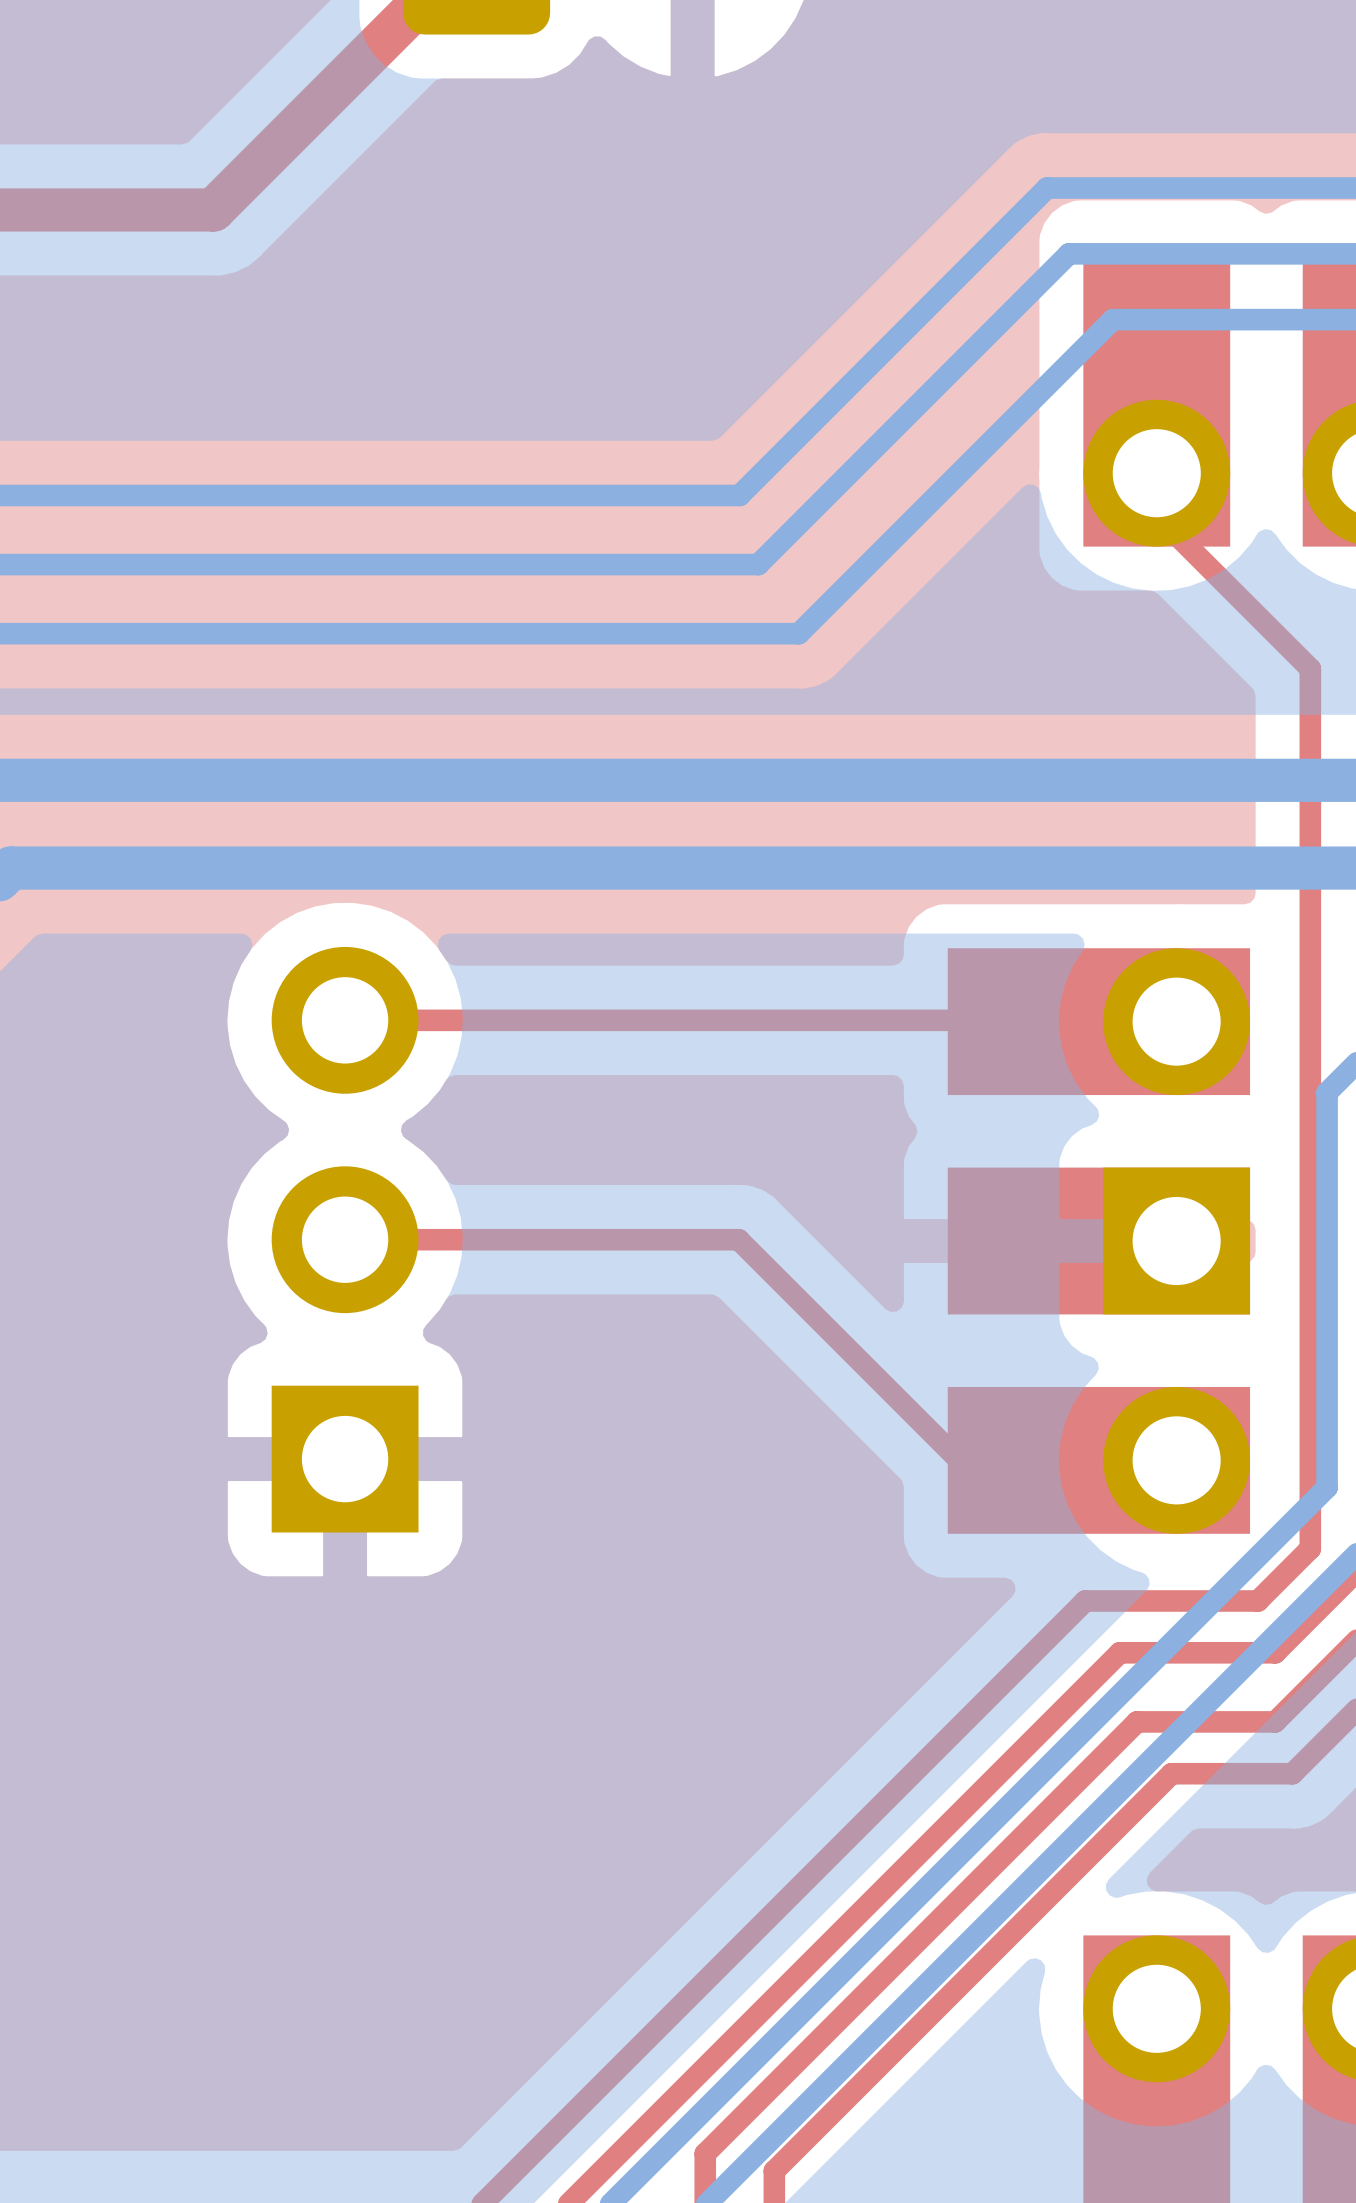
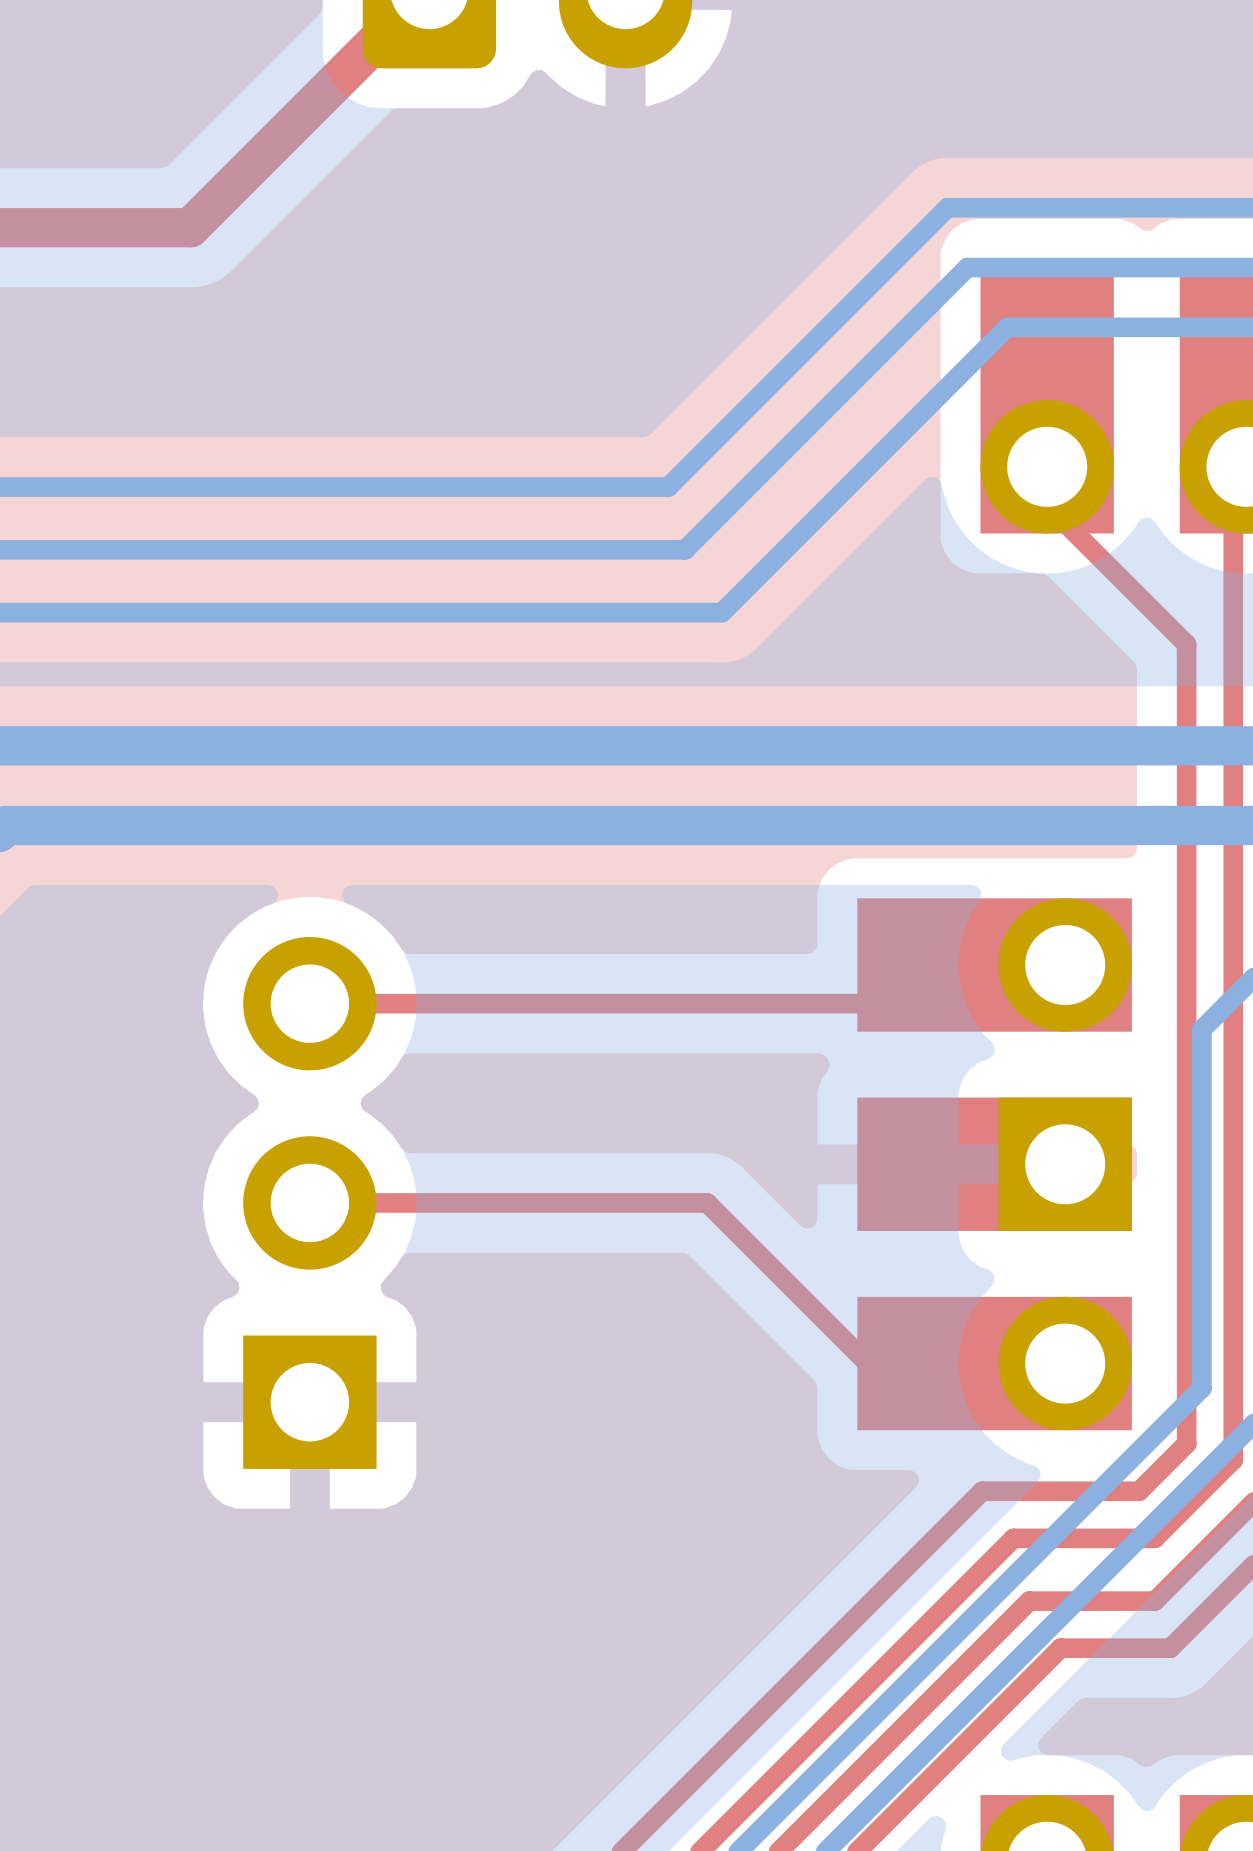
top track: (345, 1020) (1176, 1021) -> (309, 1003) (1026, 1003) (1065, 965)
top track: (345, 1239) (738, 1239) (782, 1283) -> (309, 1202) (707, 1202)
part position: (345, 1239) -> (309, 1202)

